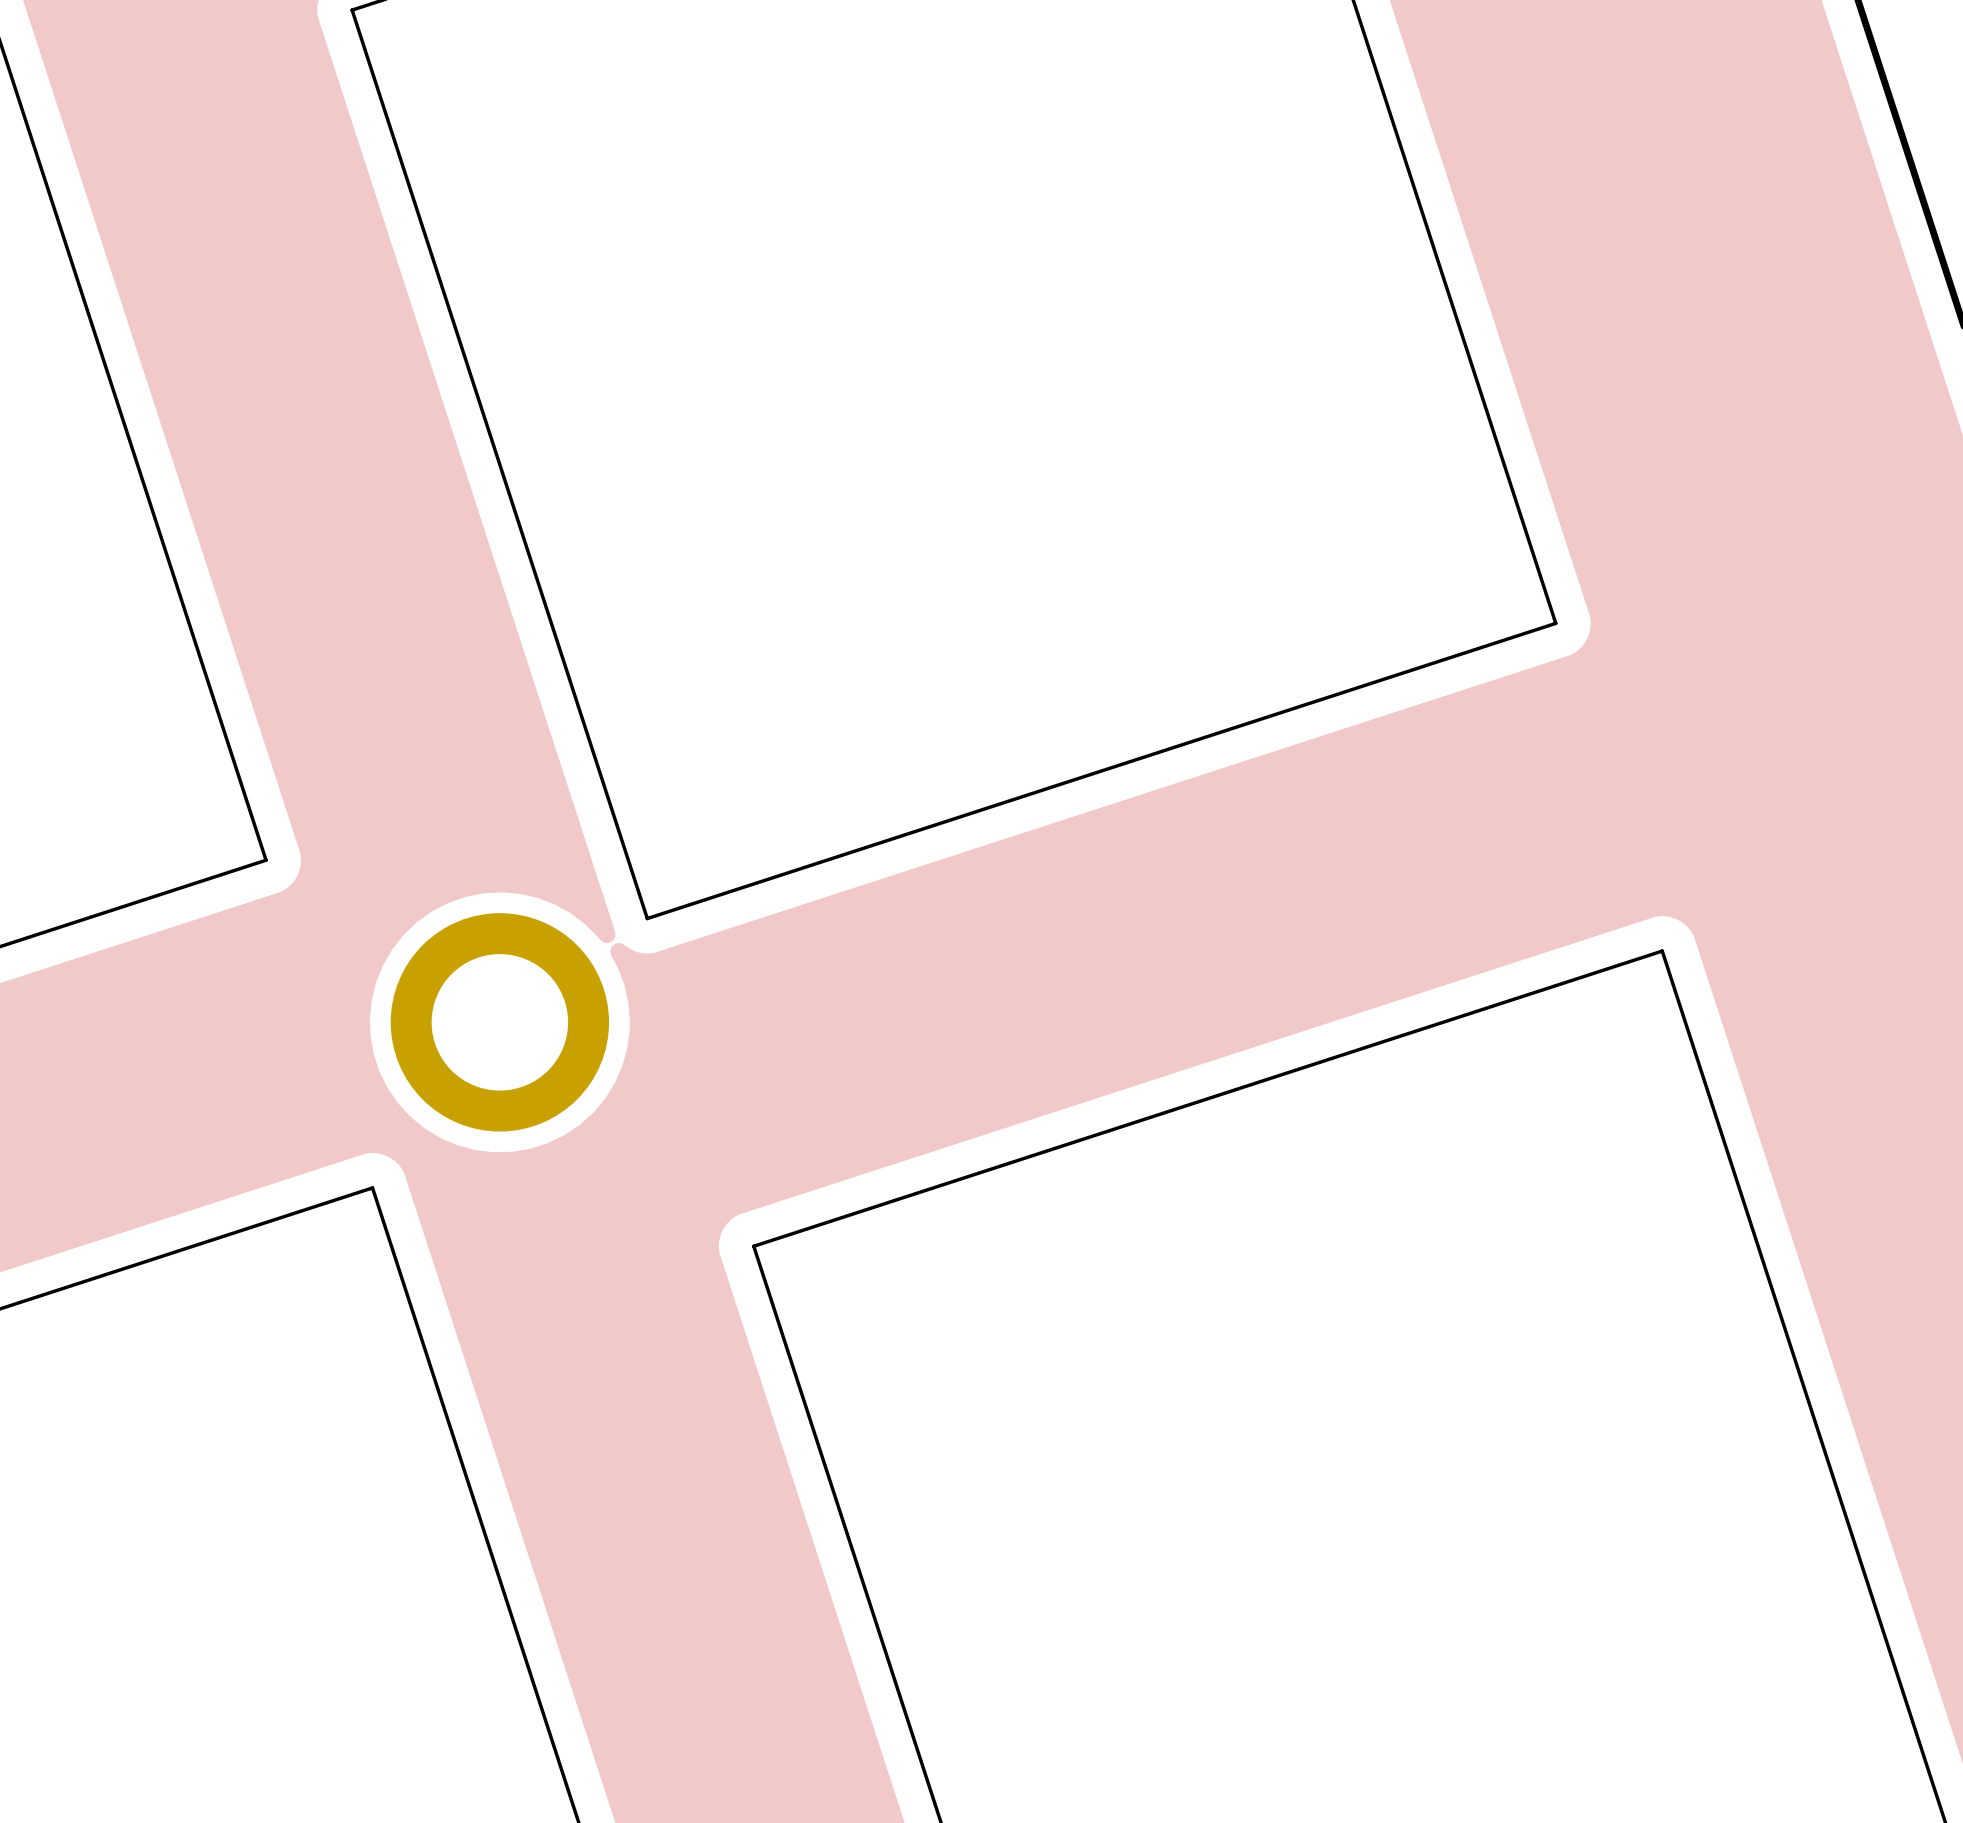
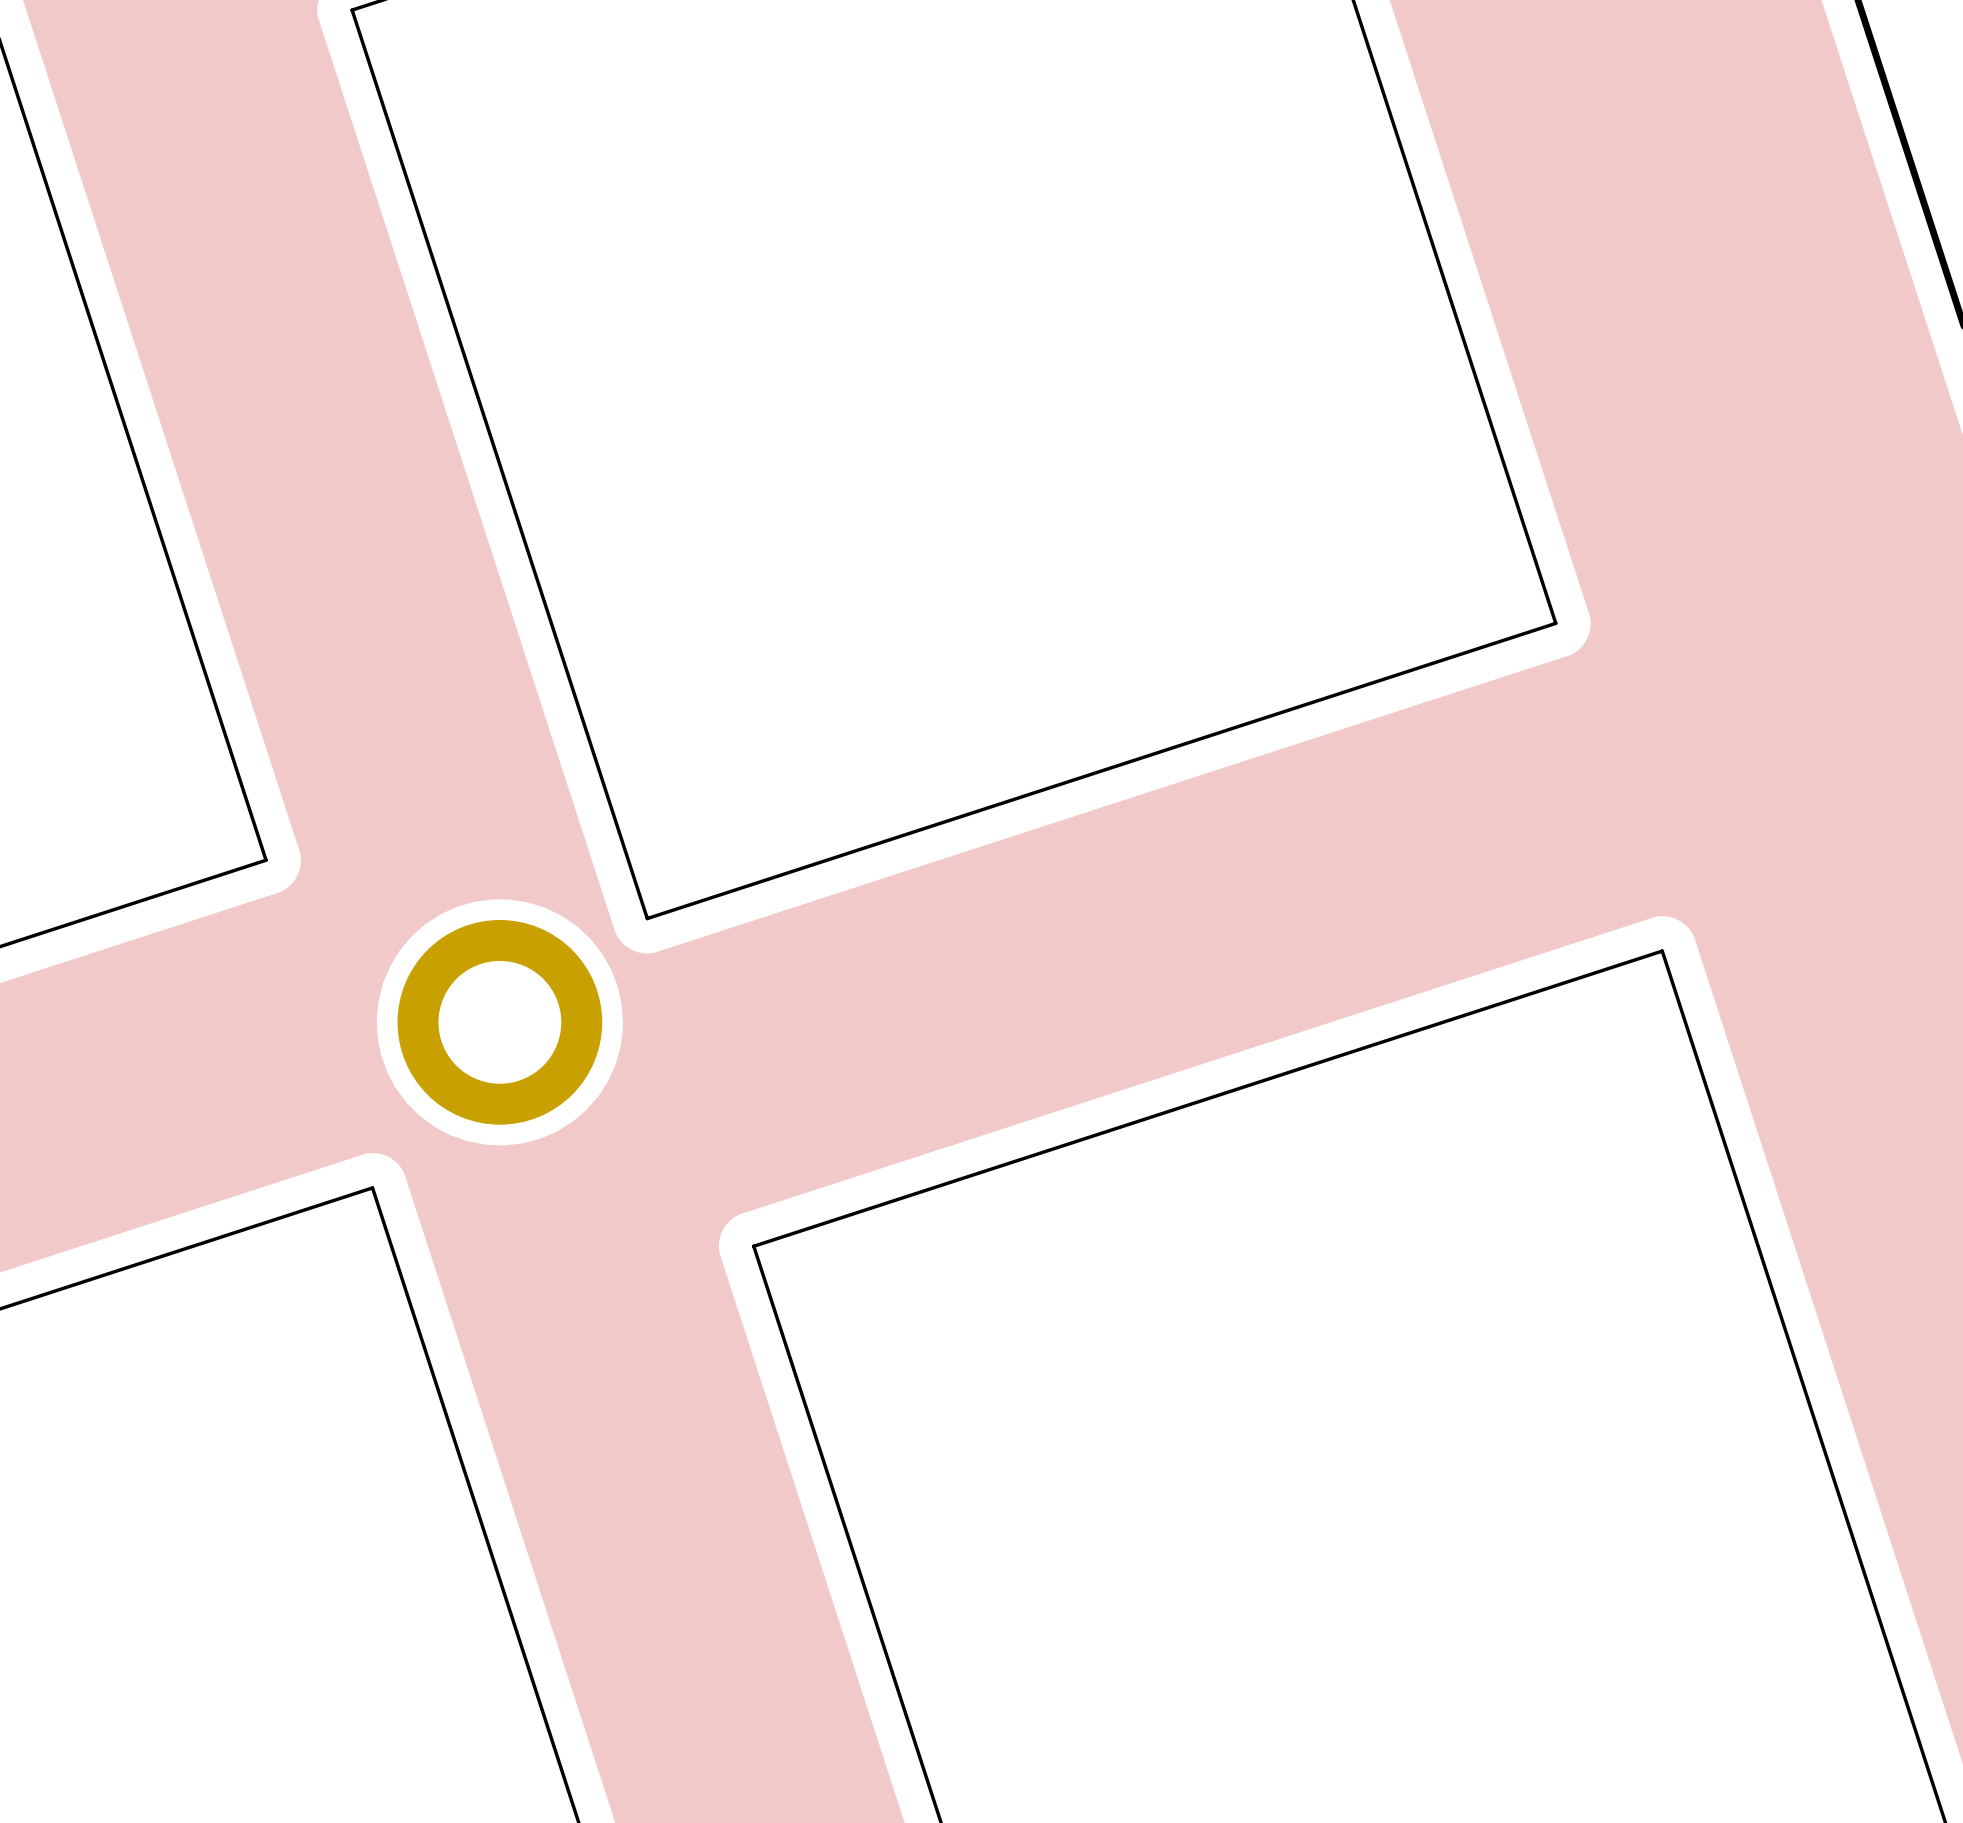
part footprint: [390, 913, 610, 1132] -> [397, 919, 603, 1125]

